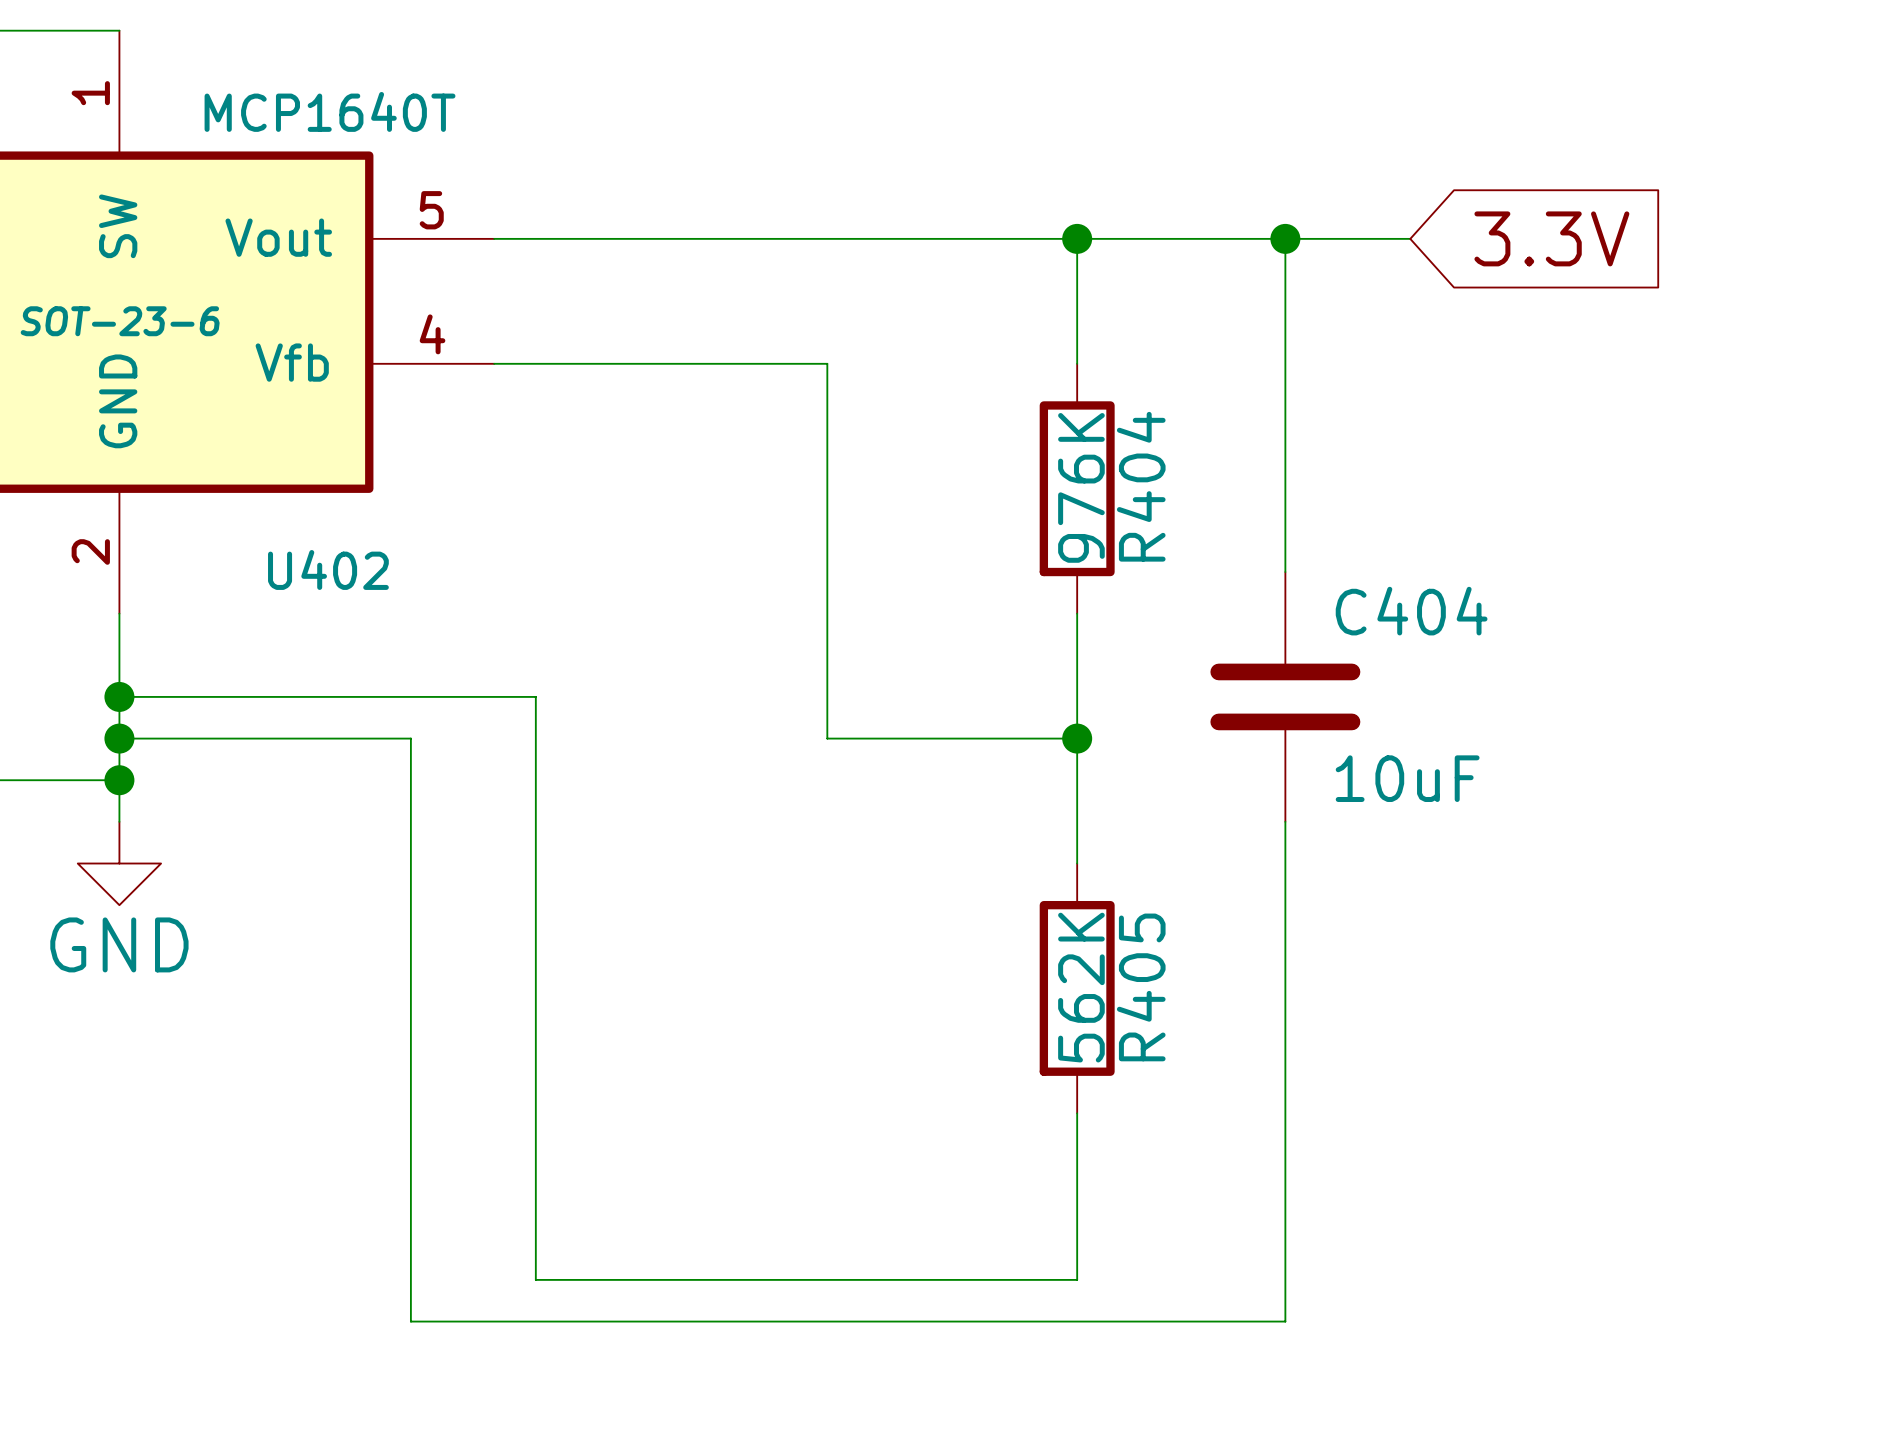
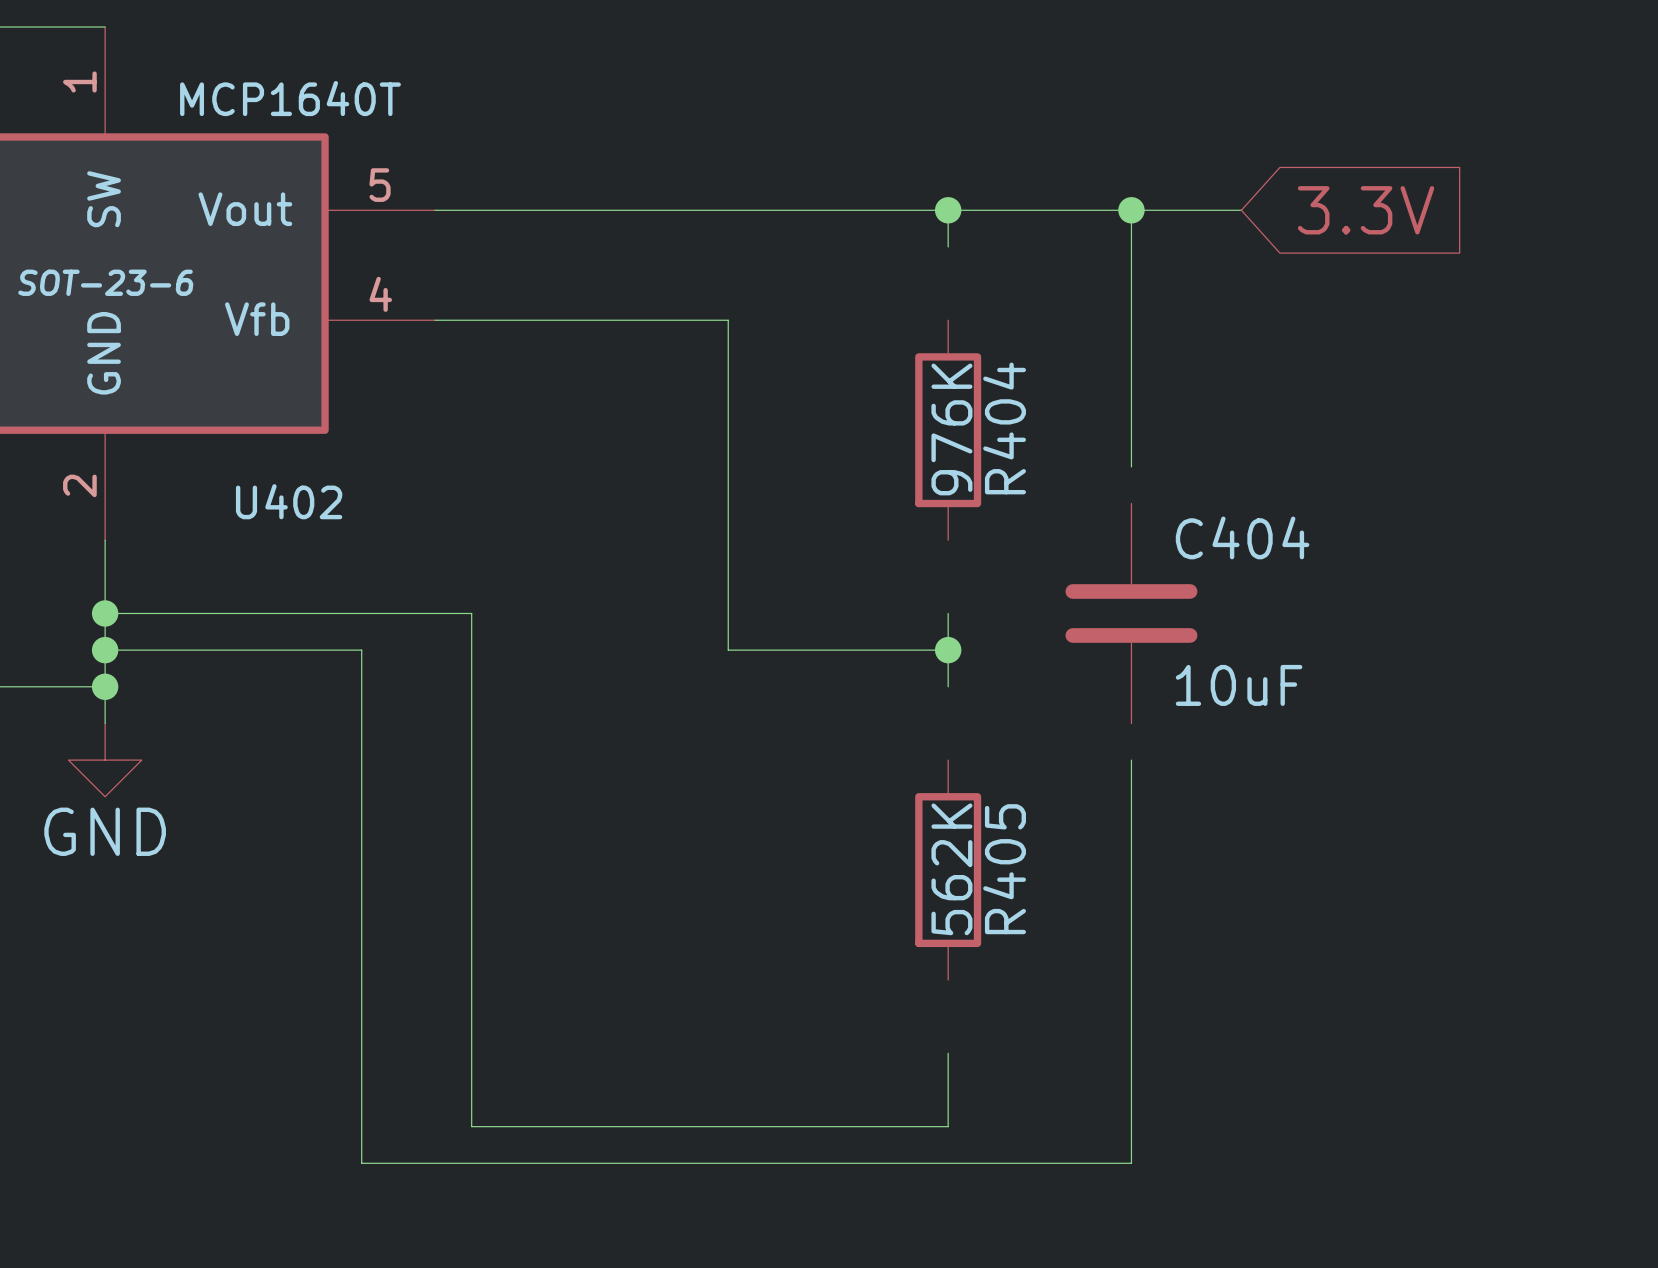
wire: (1077, 280) (1077, 363) -> none
wire: (1285, 530) (1285, 572) -> none
wire: (1077, 613) (1077, 696) -> none
wire: (1077, 780) (1077, 863) -> none
wire: (1285, 821) (1285, 863) -> none
wire: (1077, 1113) (1077, 1196) -> none

